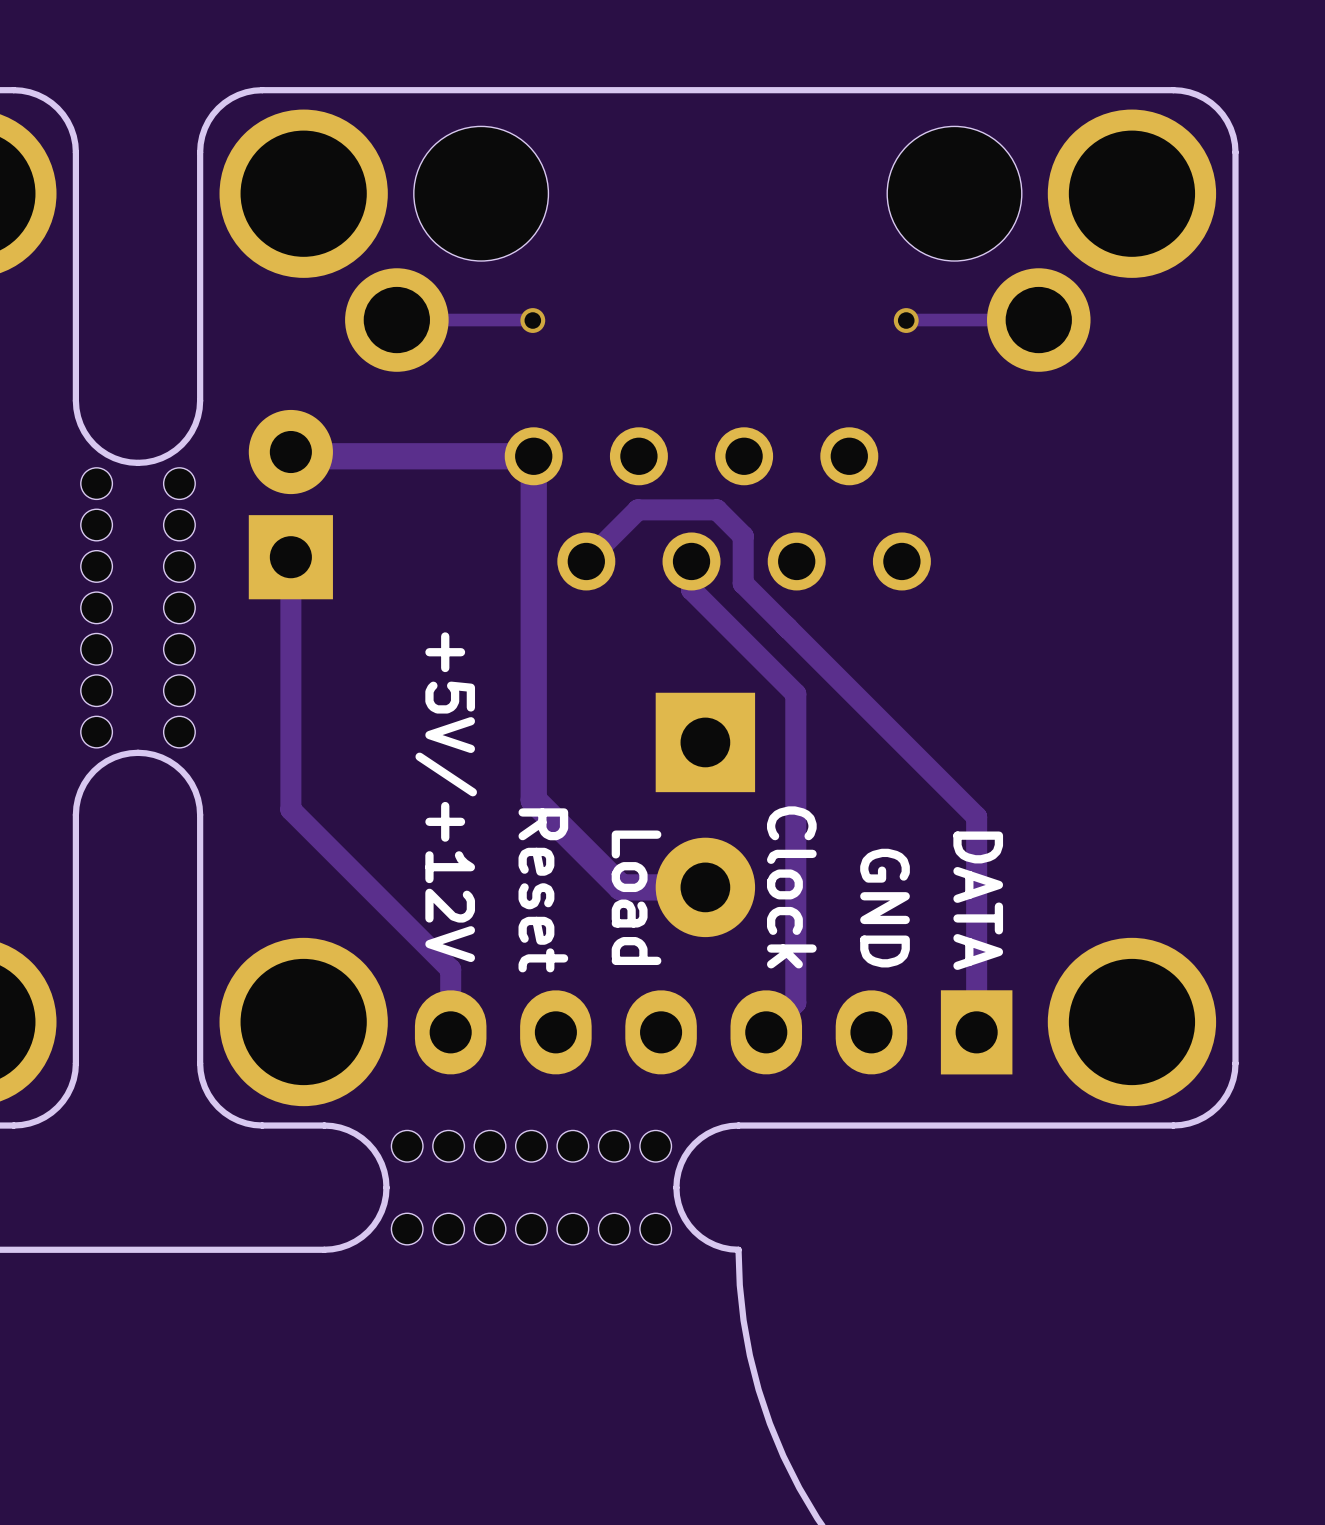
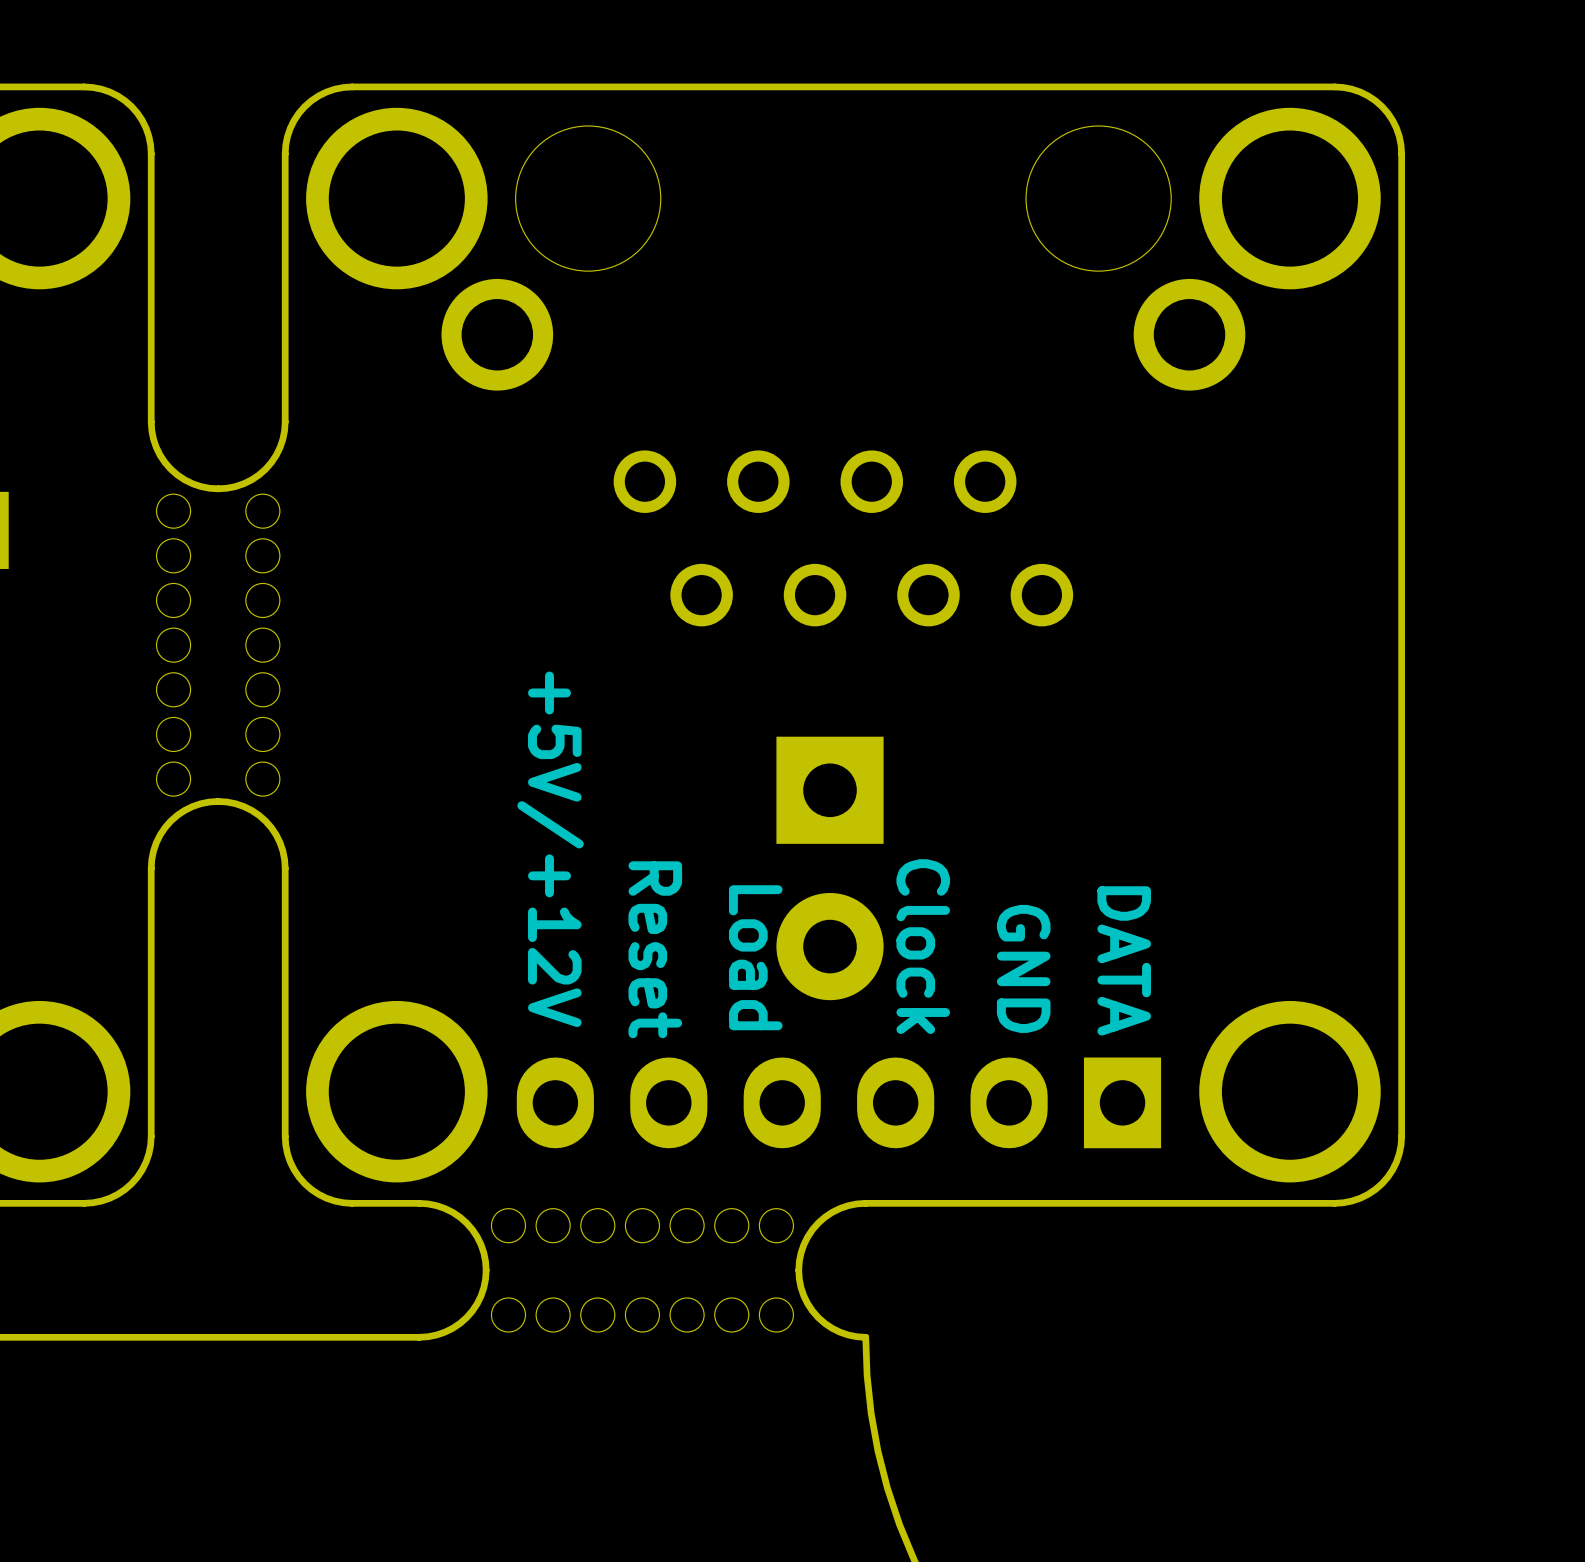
track: (532, 320) (396, 320) -> none
via: (532, 320) -> none
via: (906, 320) -> none
track: (1038, 320) (906, 320) -> none
track: (290, 452) (295, 456) (533, 456) (533, 800) (621, 887) (705, 887) -> none
part: (290, 504) -> none
track: (290, 557) (290, 809) (450, 969) (450, 1032) -> none
track: (586, 561) (637, 509) (716, 509) (743, 536) (743, 583) (976, 816) (976, 1032) -> none
track: (691, 561) (691, 589) (795, 693) (795, 1002) (766, 1032) -> none

